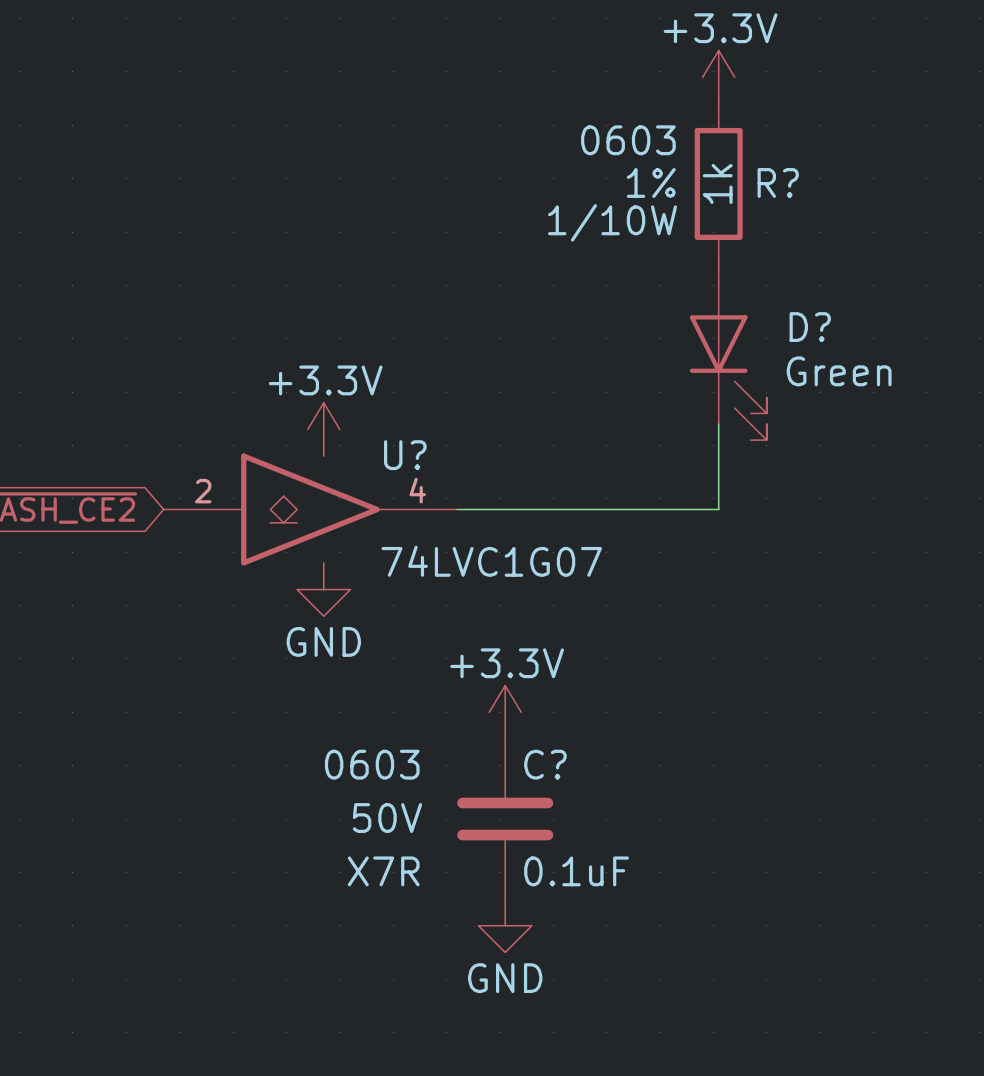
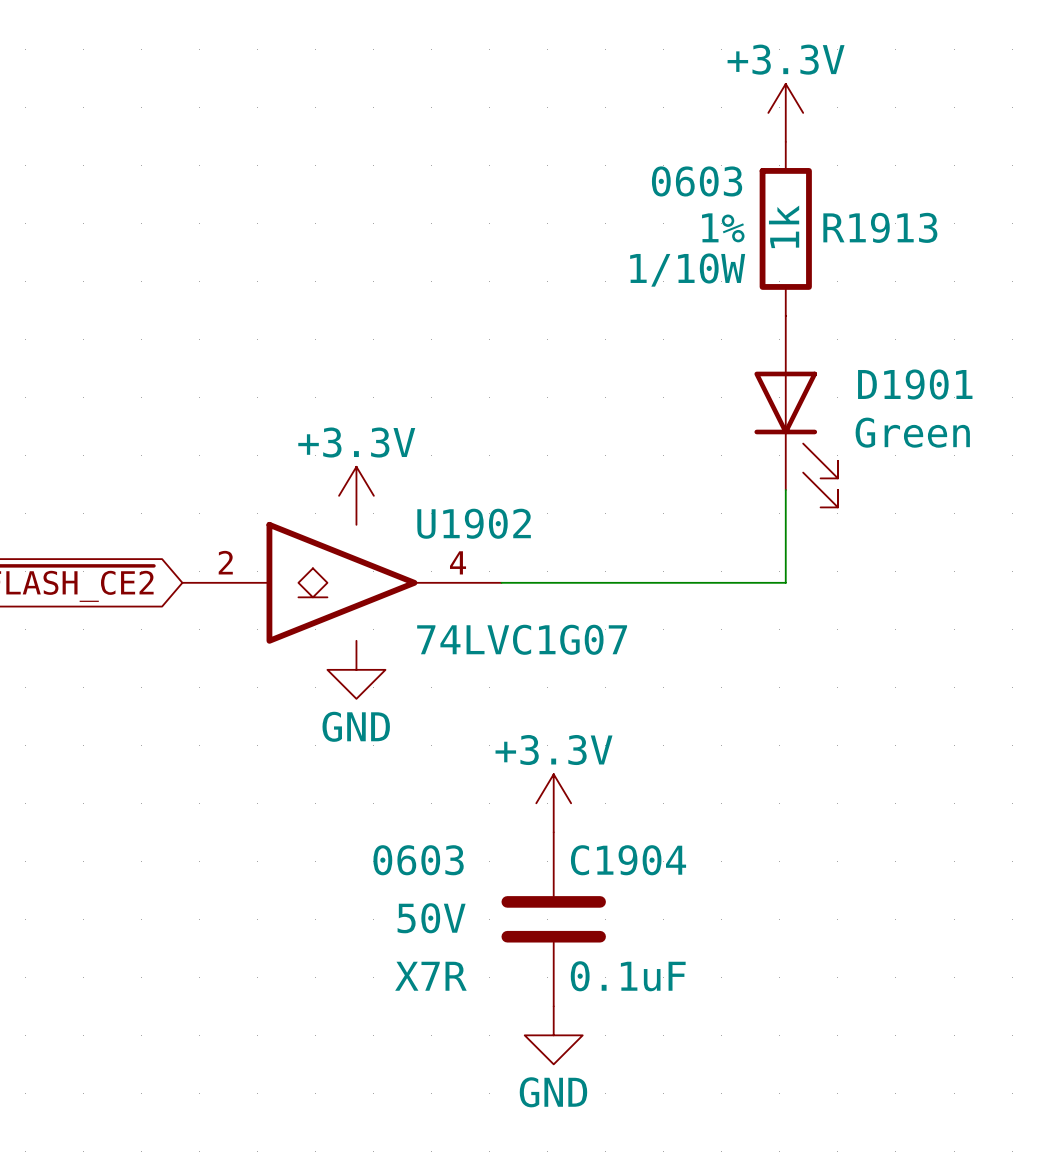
R? name: R? (778, 182) -> R1913 (880, 227)
D? name: D? (810, 327) -> D1901 (915, 384)
U? name: U? (405, 455) -> U1902 (474, 523)
C? name: C? (545, 764) -> C1904 (628, 860)

